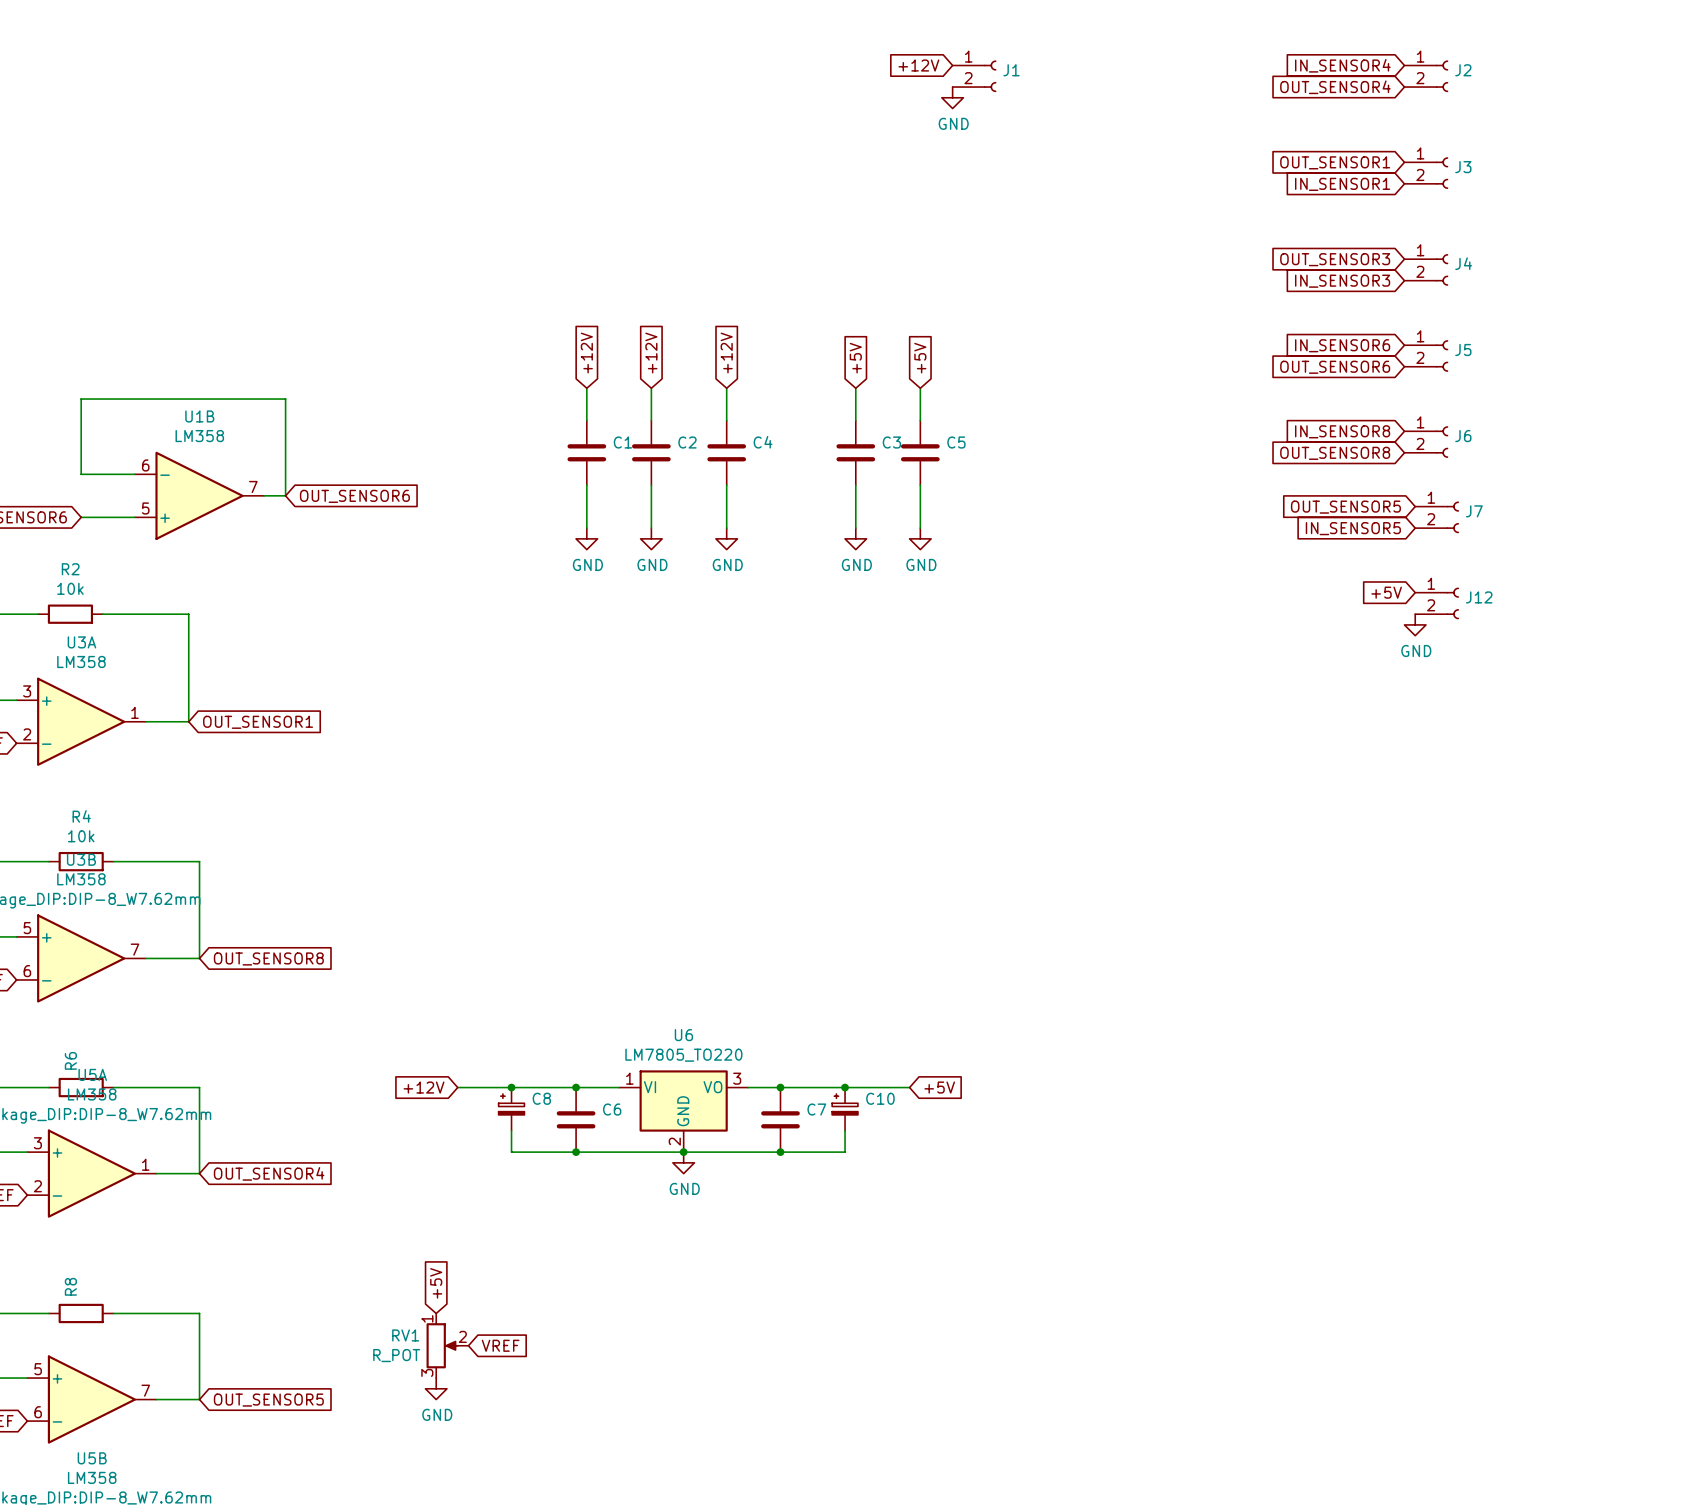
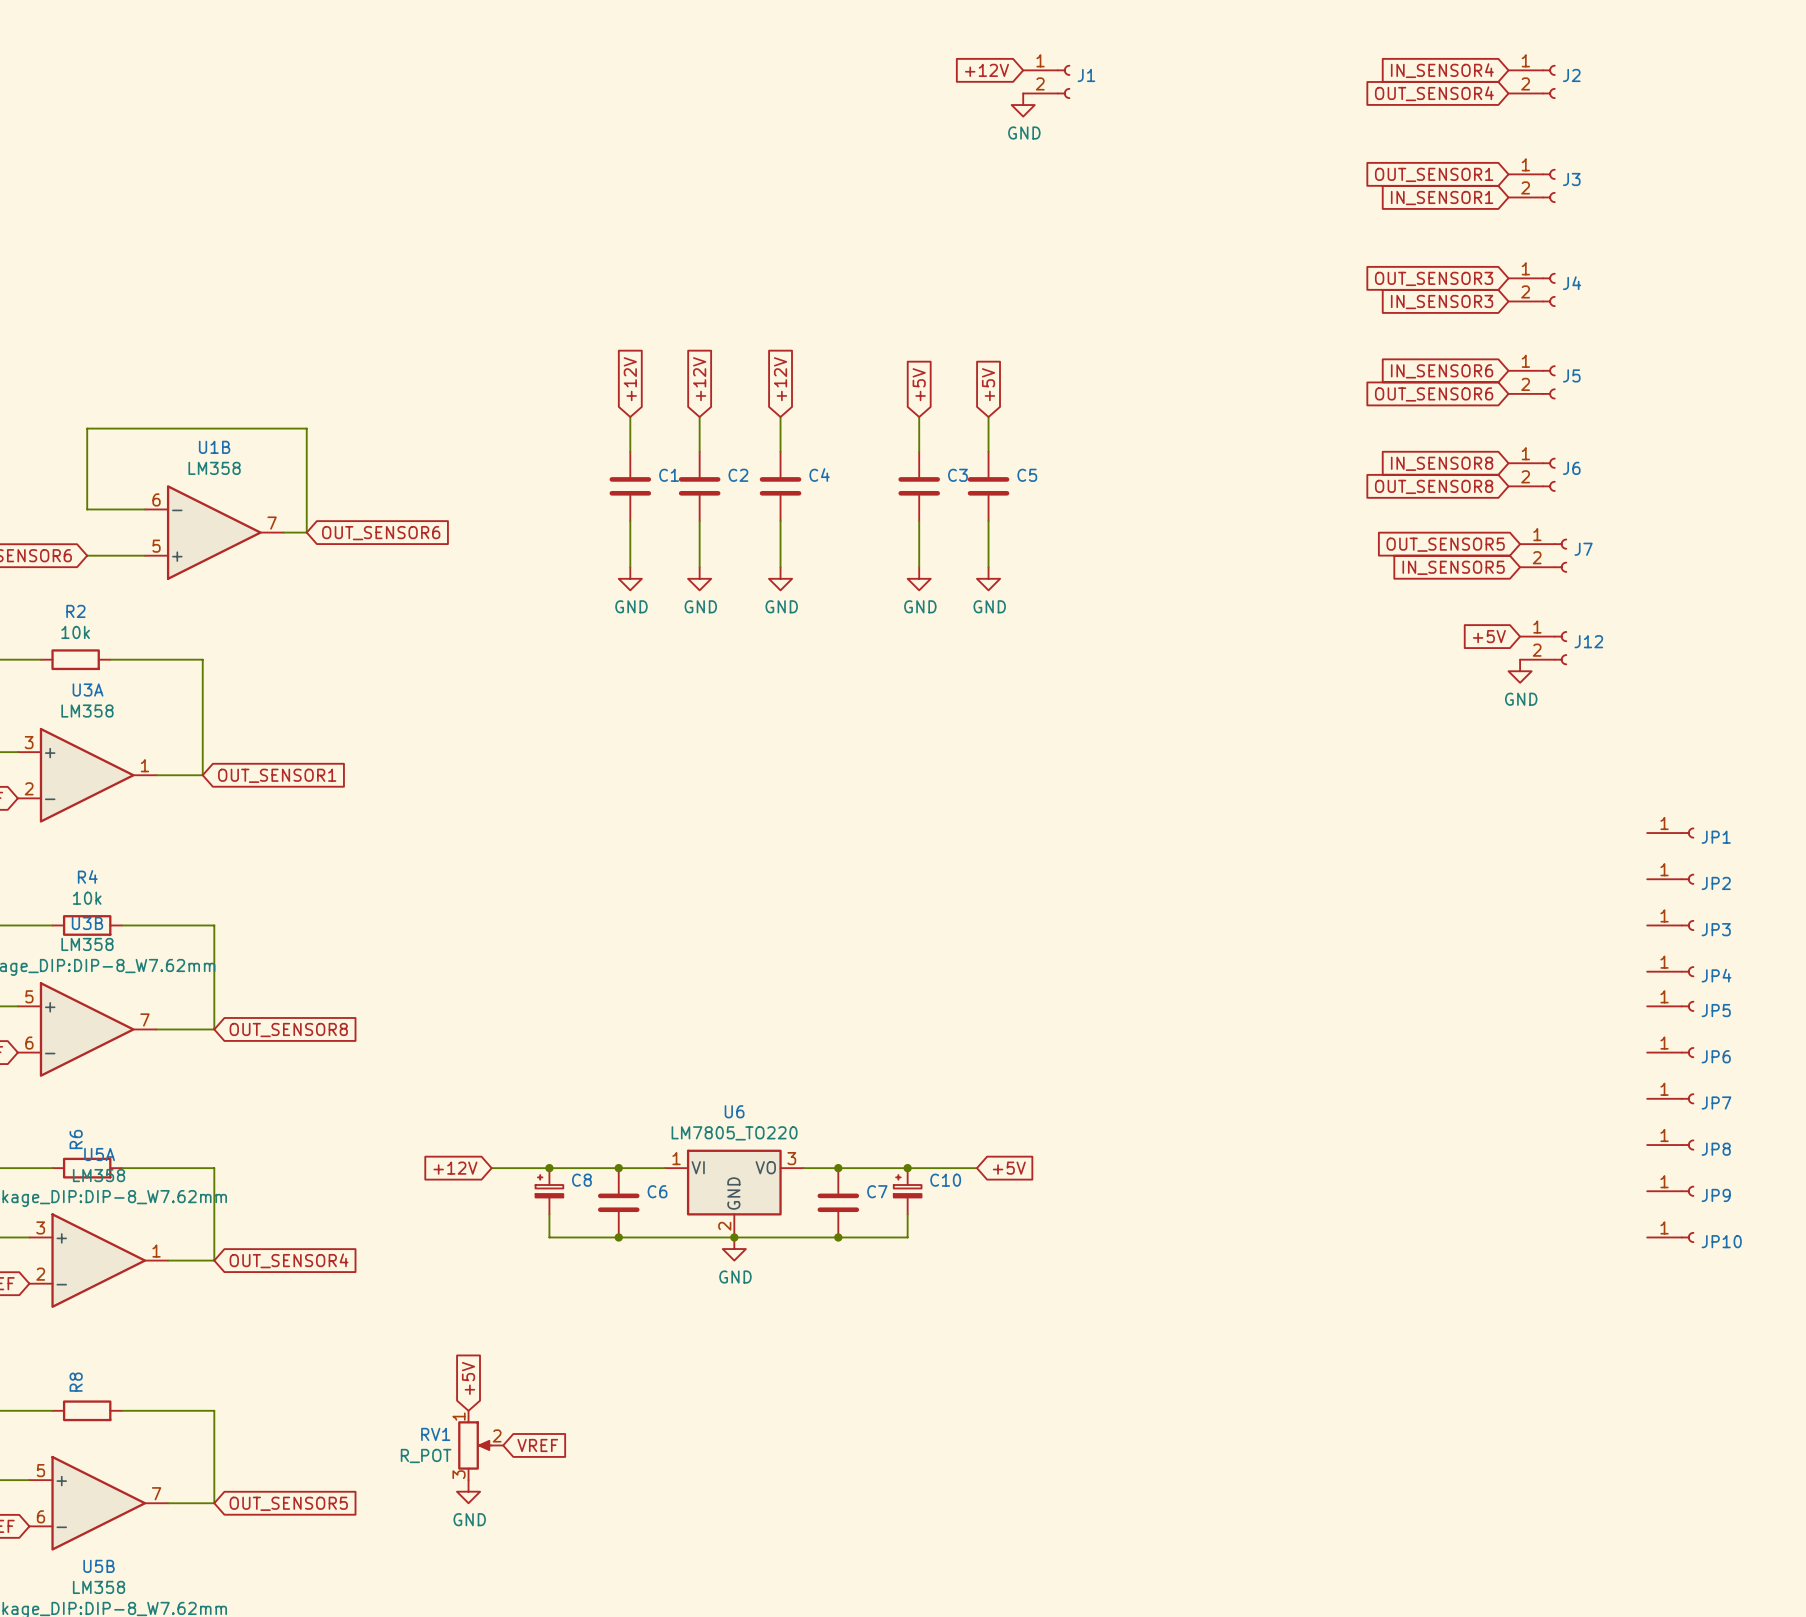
JP1: none -> (1670, 833)
JP2: none -> (1670, 879)
JP3: none -> (1670, 925)
JP4: none -> (1670, 971)
JP5: none -> (1670, 1006)
JP6: none -> (1670, 1052)
JP7: none -> (1670, 1098)
JP8: none -> (1670, 1145)
JP9: none -> (1670, 1191)
JP10: none -> (1670, 1237)

